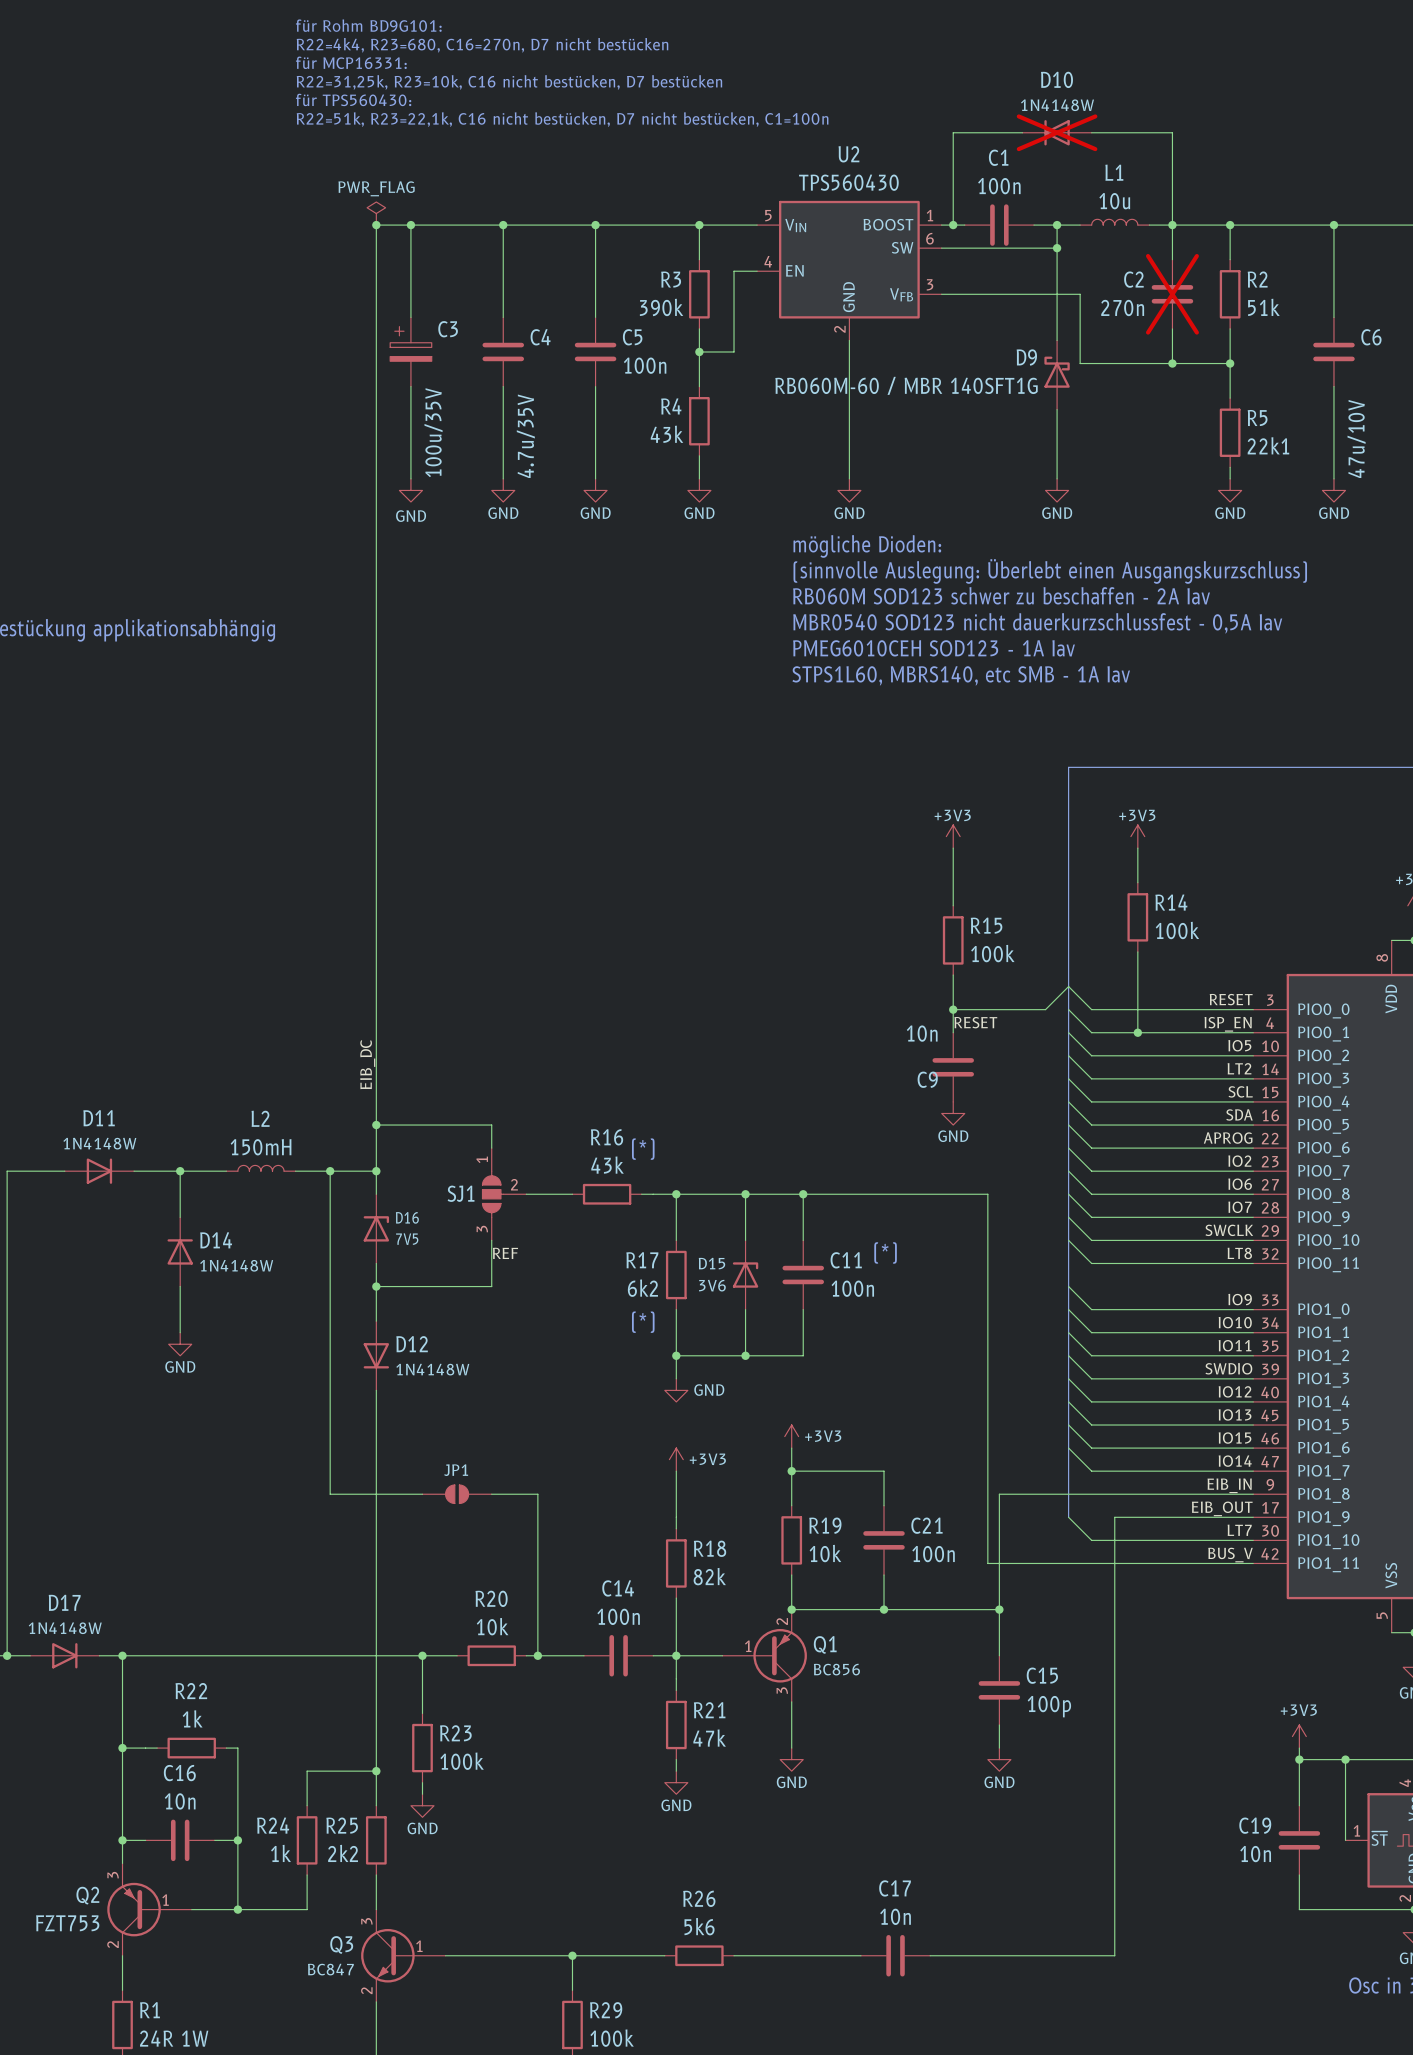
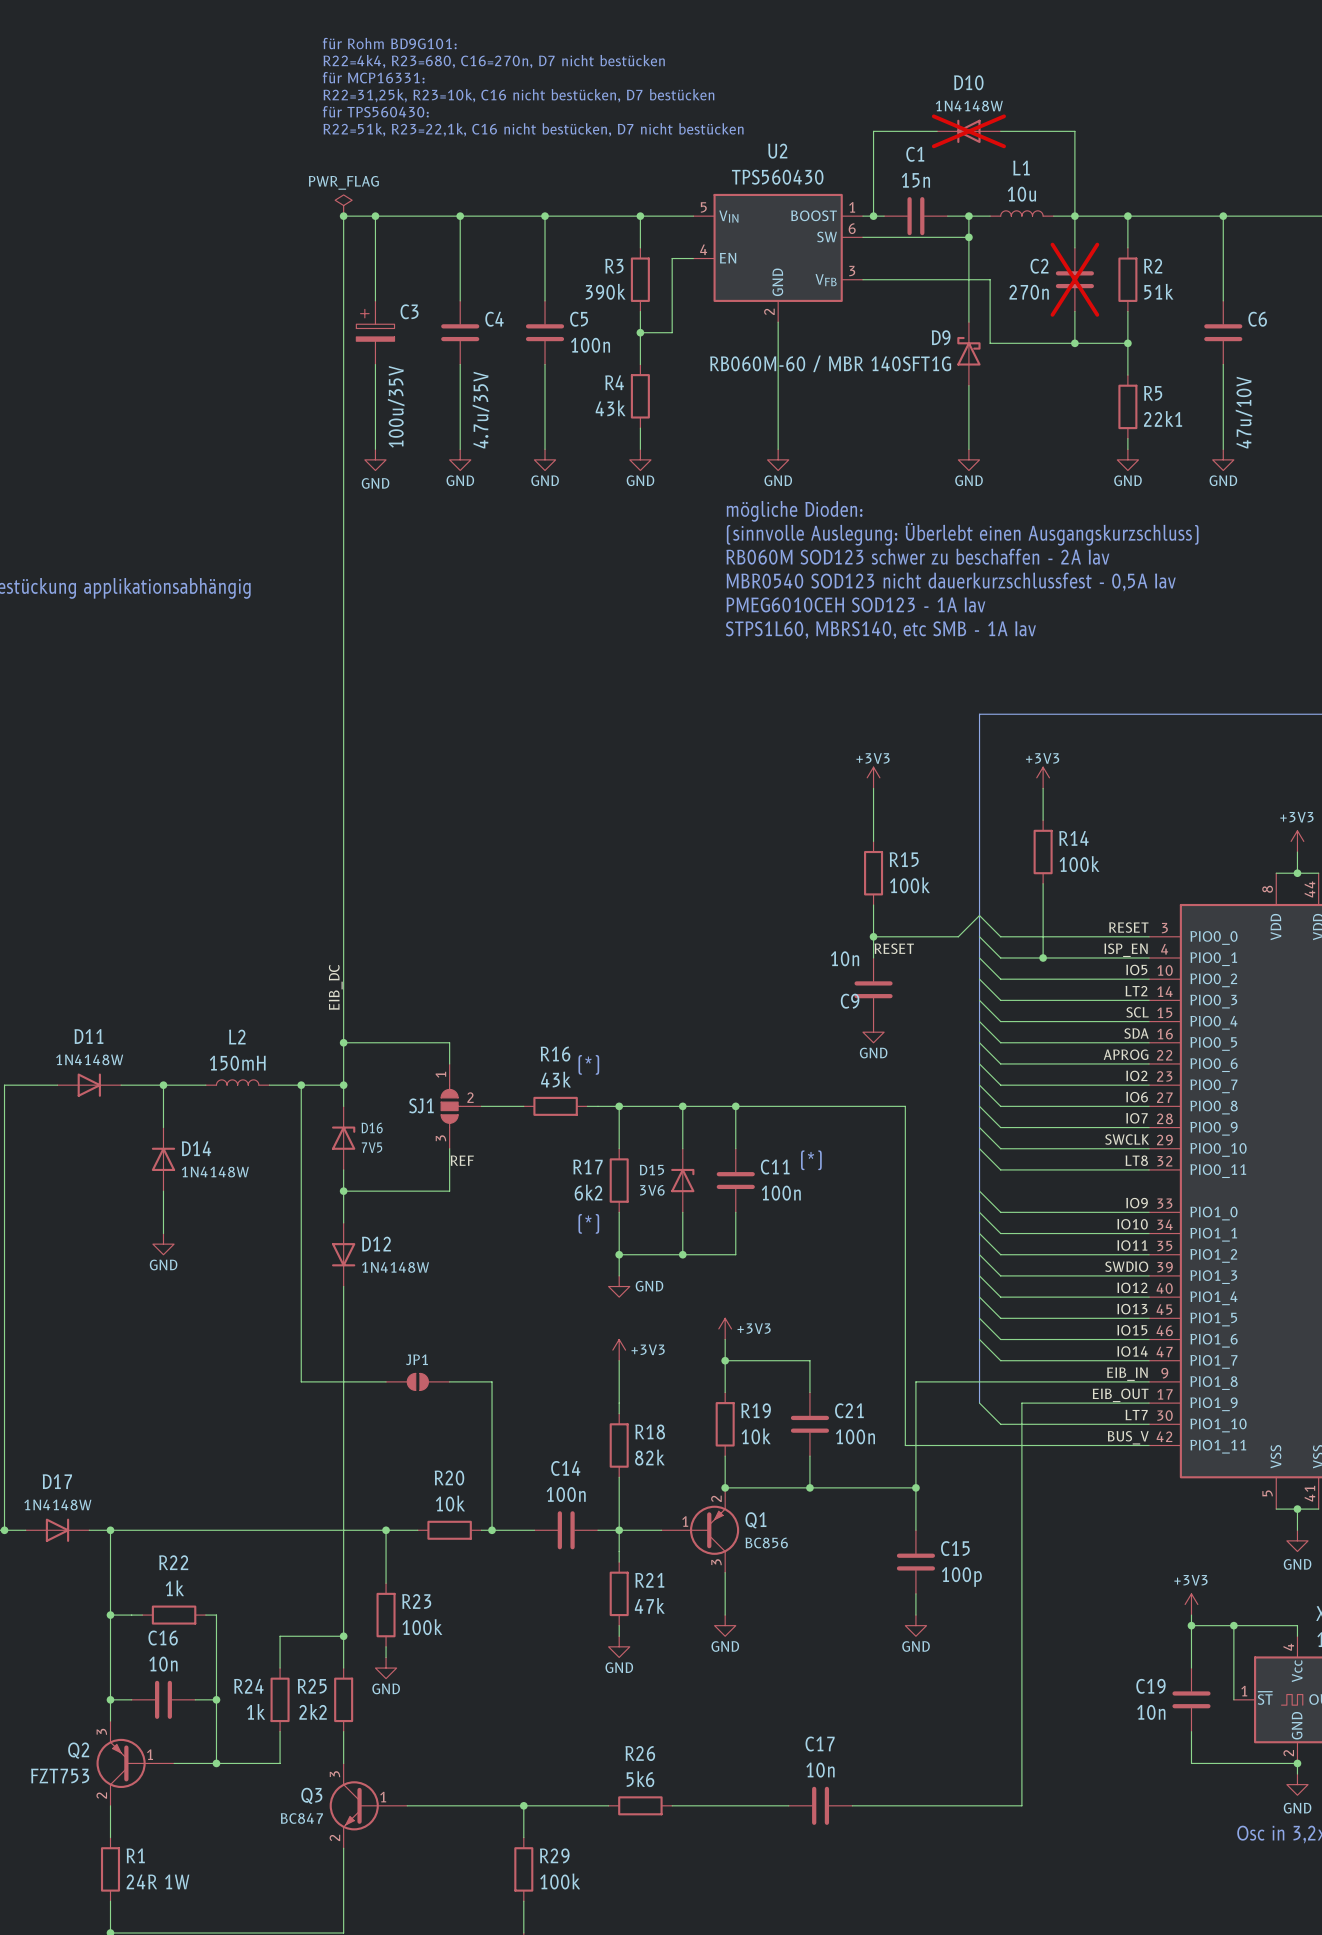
text position: für Rohm BD9G101: (368, 25) -> für Rohm BD9G101: (389, 43)
text position: R22=4k4, R23=680, C16=270n, D7 nicht bestücken (482, 45) -> R22=4k4, R23=680, C16=270n, D7 nicht bestücken (494, 61)
text position: für MCP16331: (351, 62) -> für MCP16331: (373, 77)
text position: R22=31,25k, R23=10k, C16 nicht bestücken, D7 bestücken (509, 82) -> R22=31,25k, R23=10k, C16 nicht bestücken, D7 bestücken (518, 95)
text position: für TPS560430: (353, 99) -> für TPS560430: (375, 111)
text: R22=51k, R23=22,1k, C16 nicht bestücken, D7 nicht bestücken, C1=100n (562, 119) -> R22=51k, R23=22,1k, C16 nicht bestücken, D7 nicht bestücken (533, 129)
C1 value: 100n (999, 186) -> 15n (915, 180)

